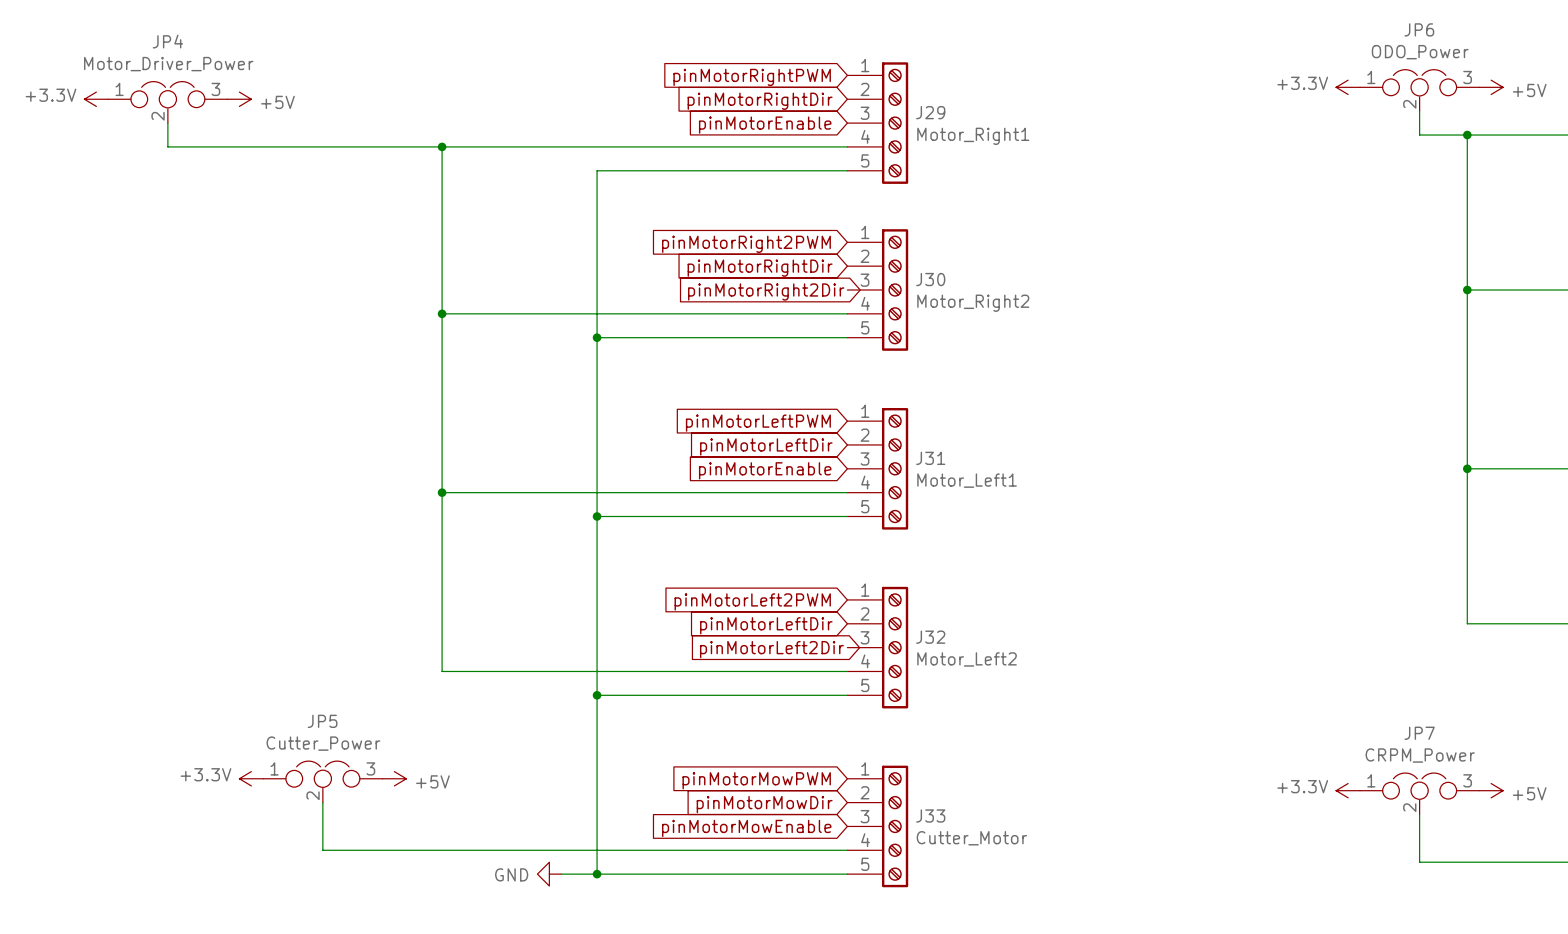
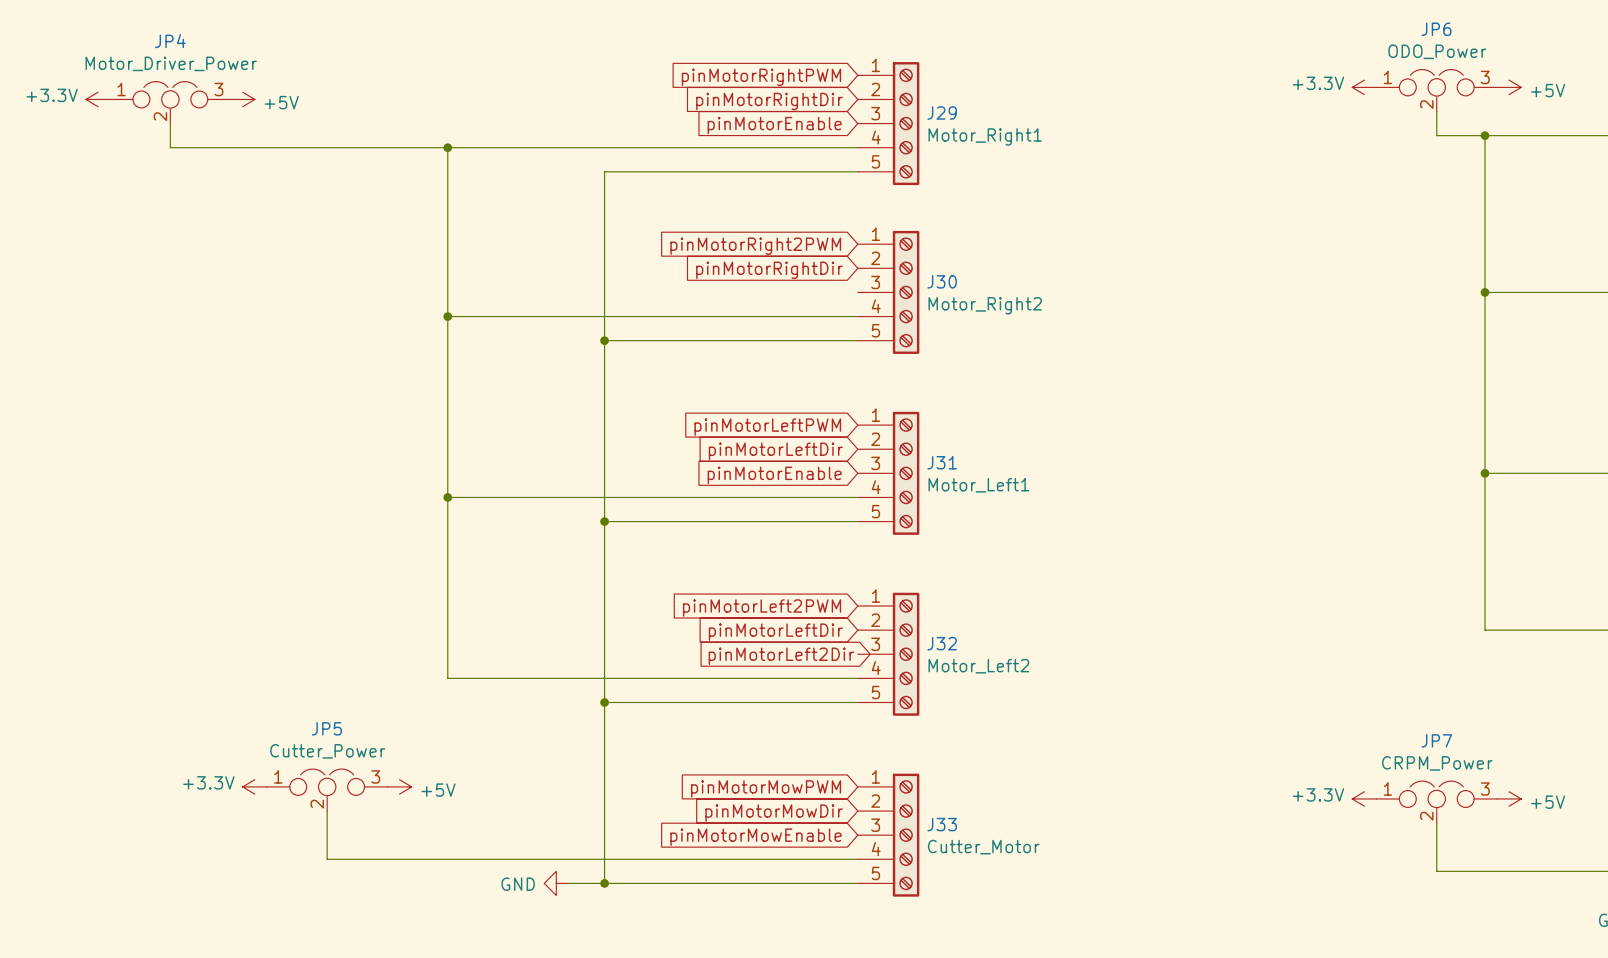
global label: pinMotorRight2Dir (766, 291) -> none

